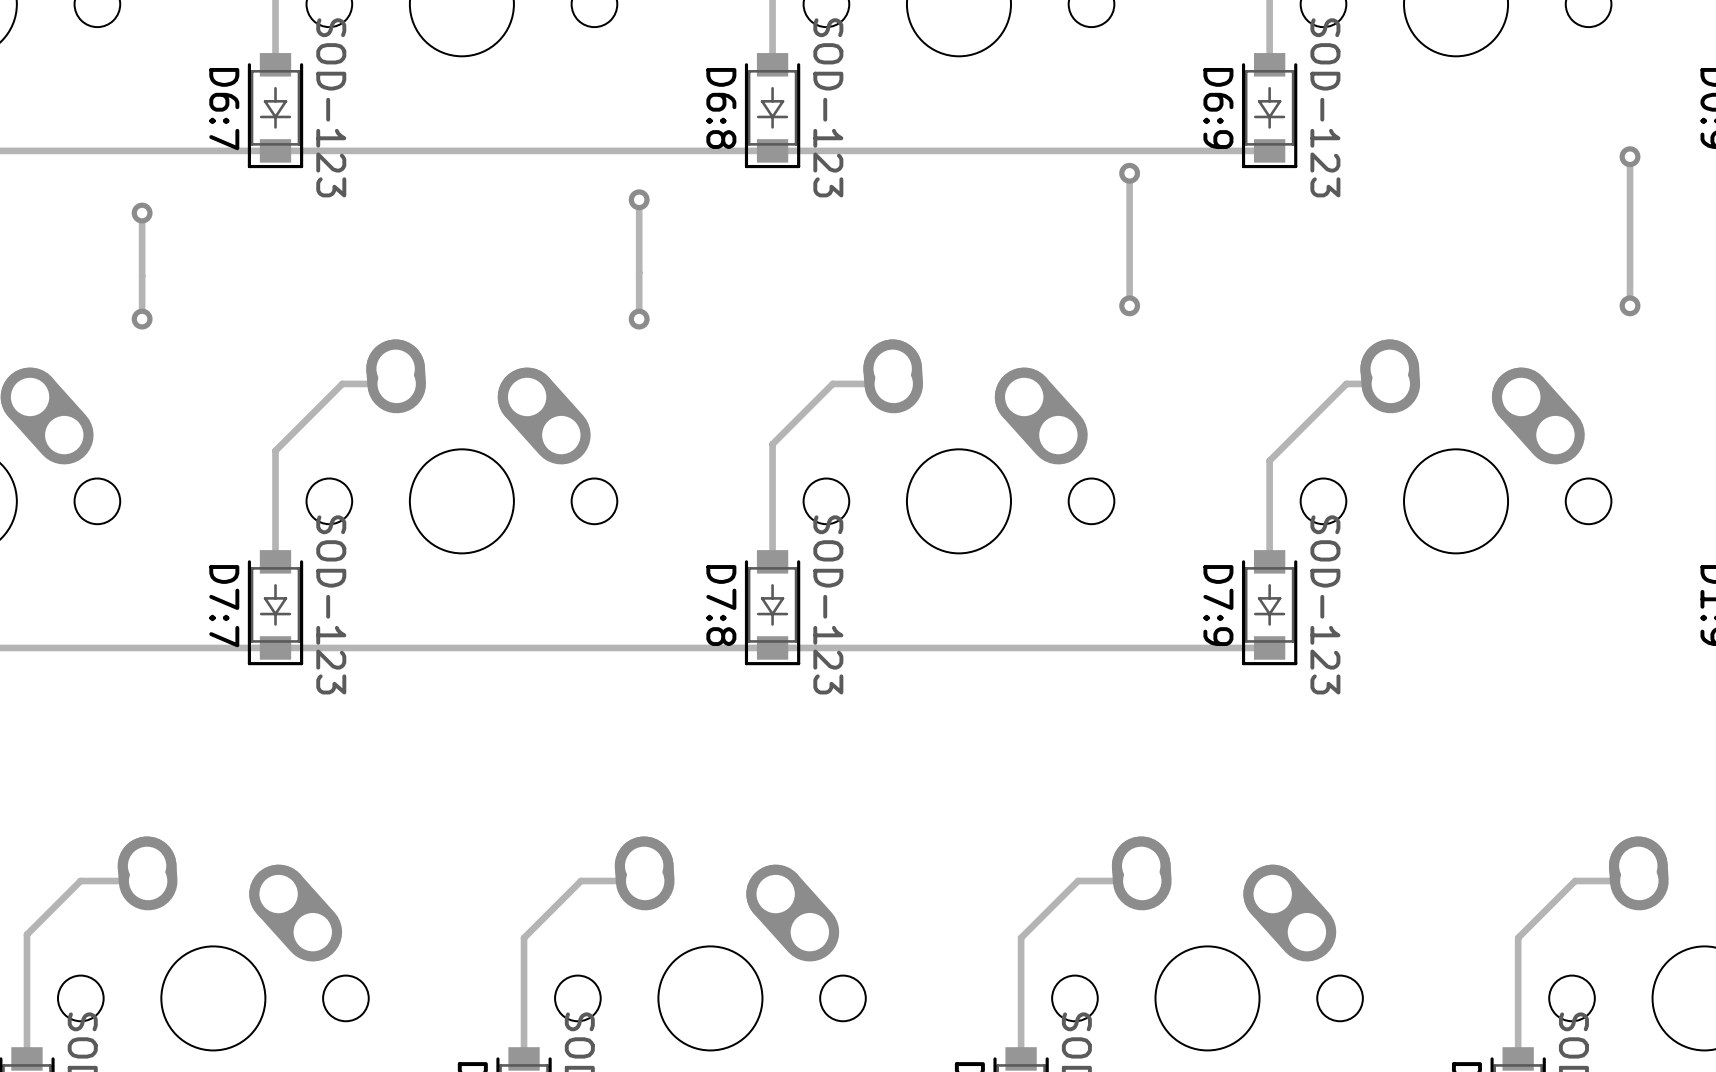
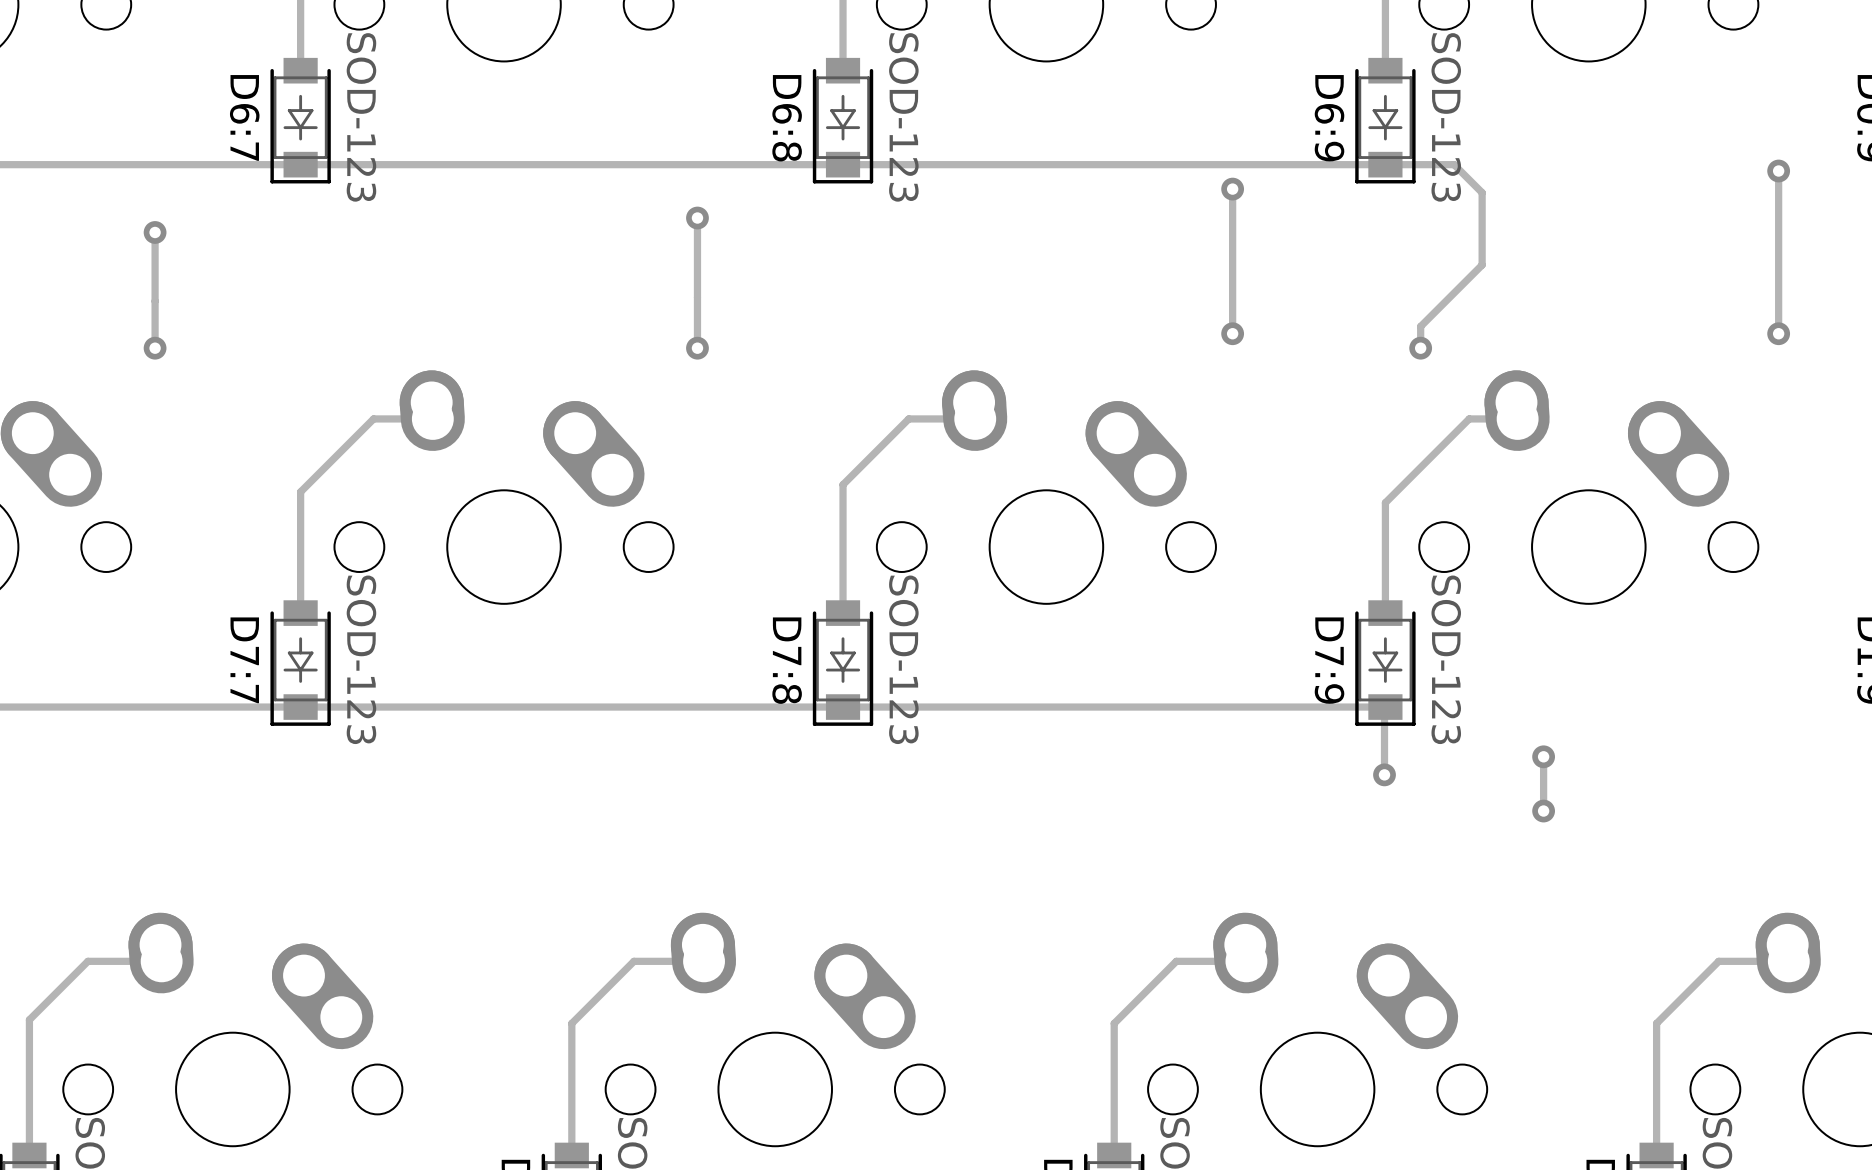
track: none -> (1385, 164) (1454, 164) (1482, 192) (1482, 265) (1420, 326) (1420, 348)
via: none -> (1420, 348)
track: none -> (1385, 707) (1384, 774)
track: none -> (1543, 756) (1543, 811)
via: none -> (1543, 756)
via: none -> (1384, 774)
via: none -> (1543, 811)

